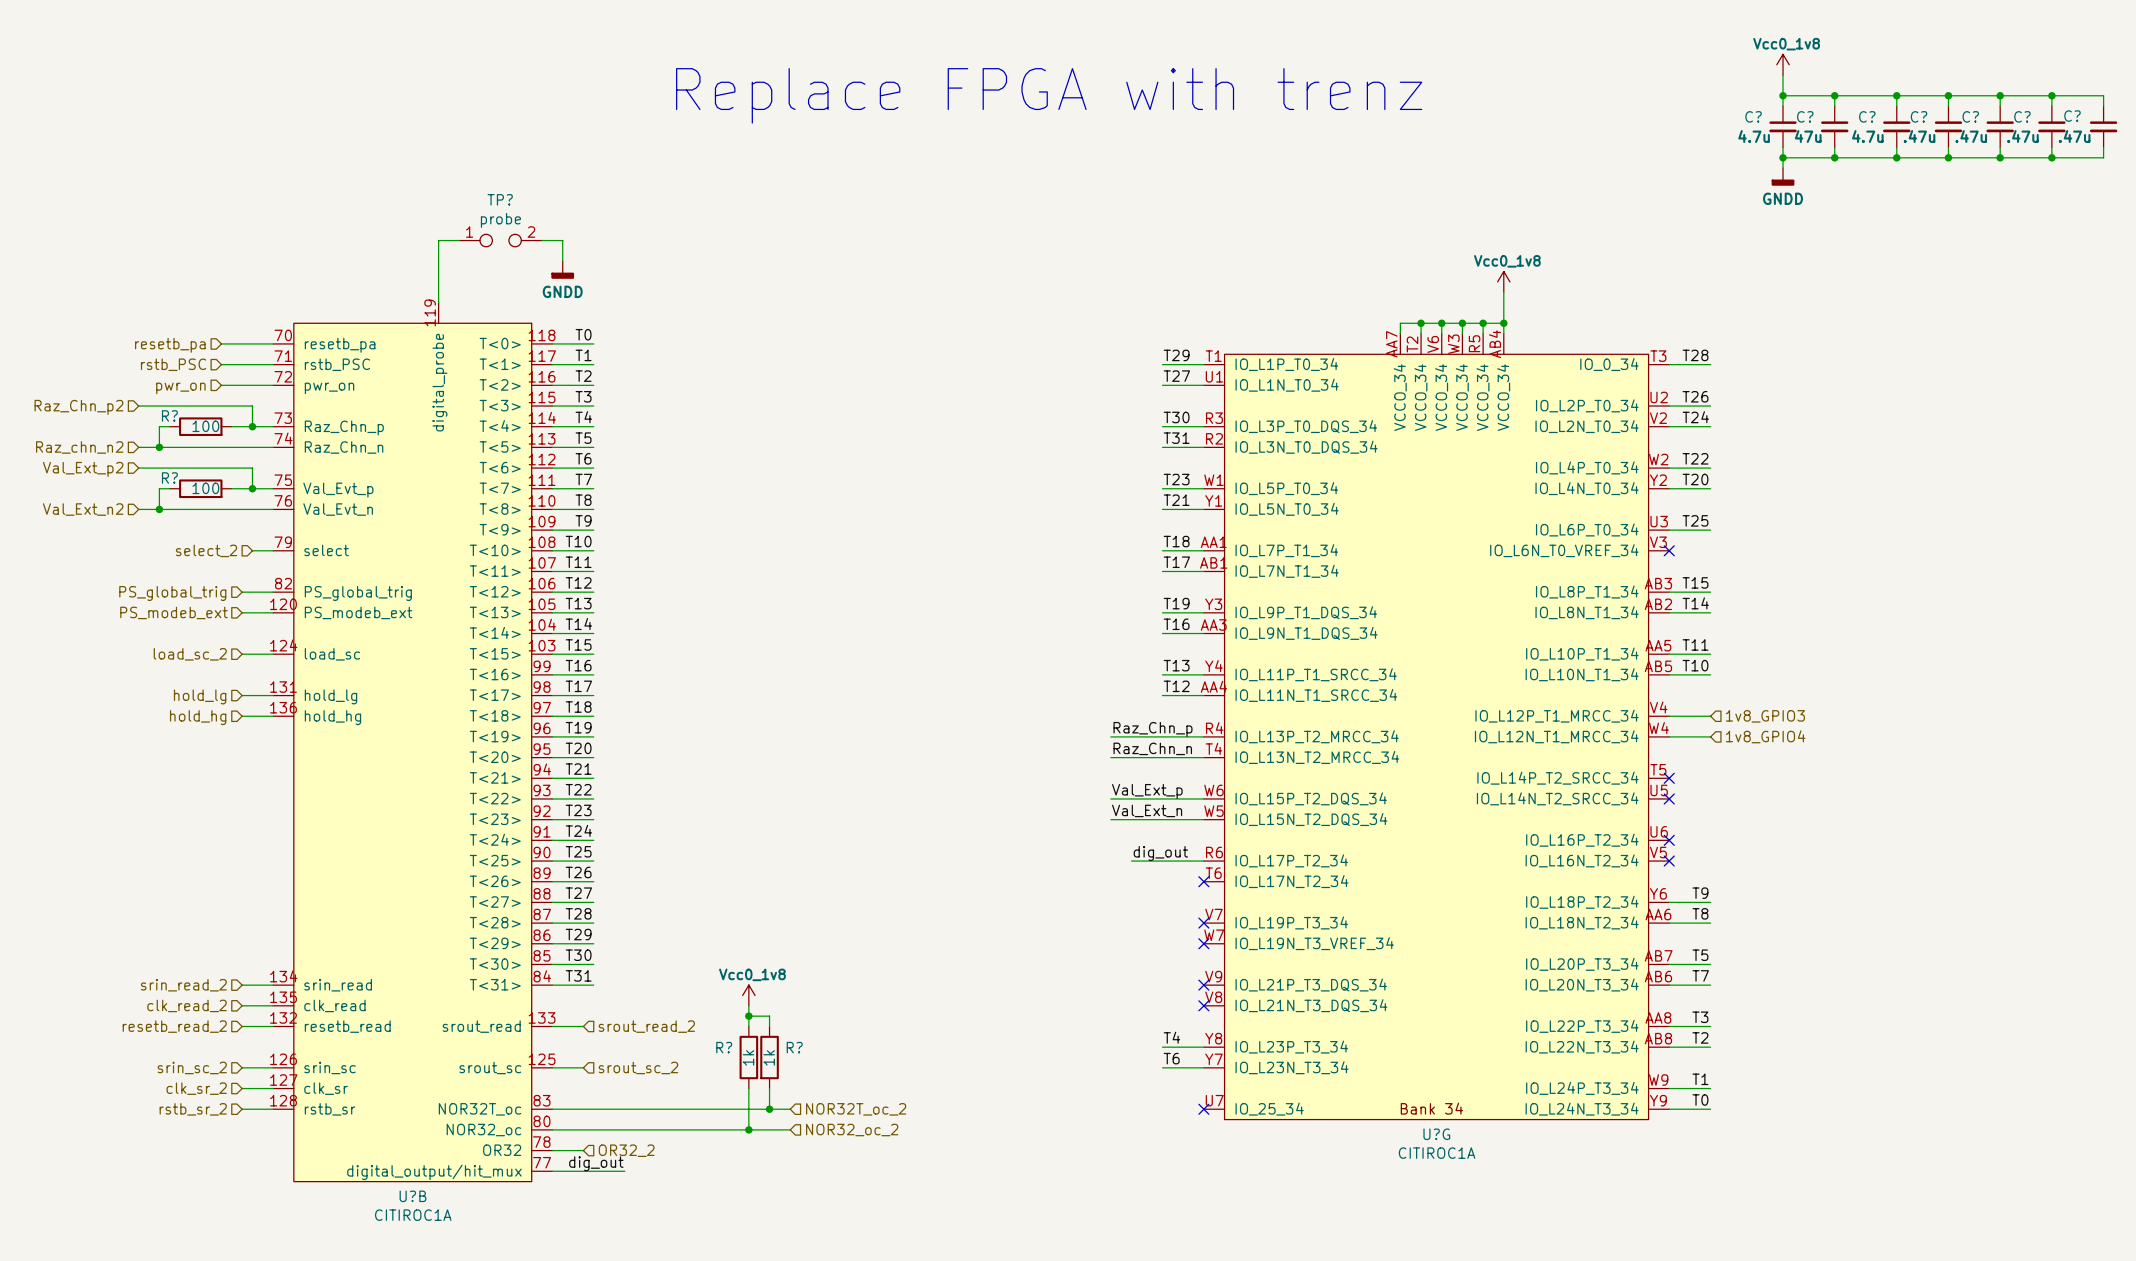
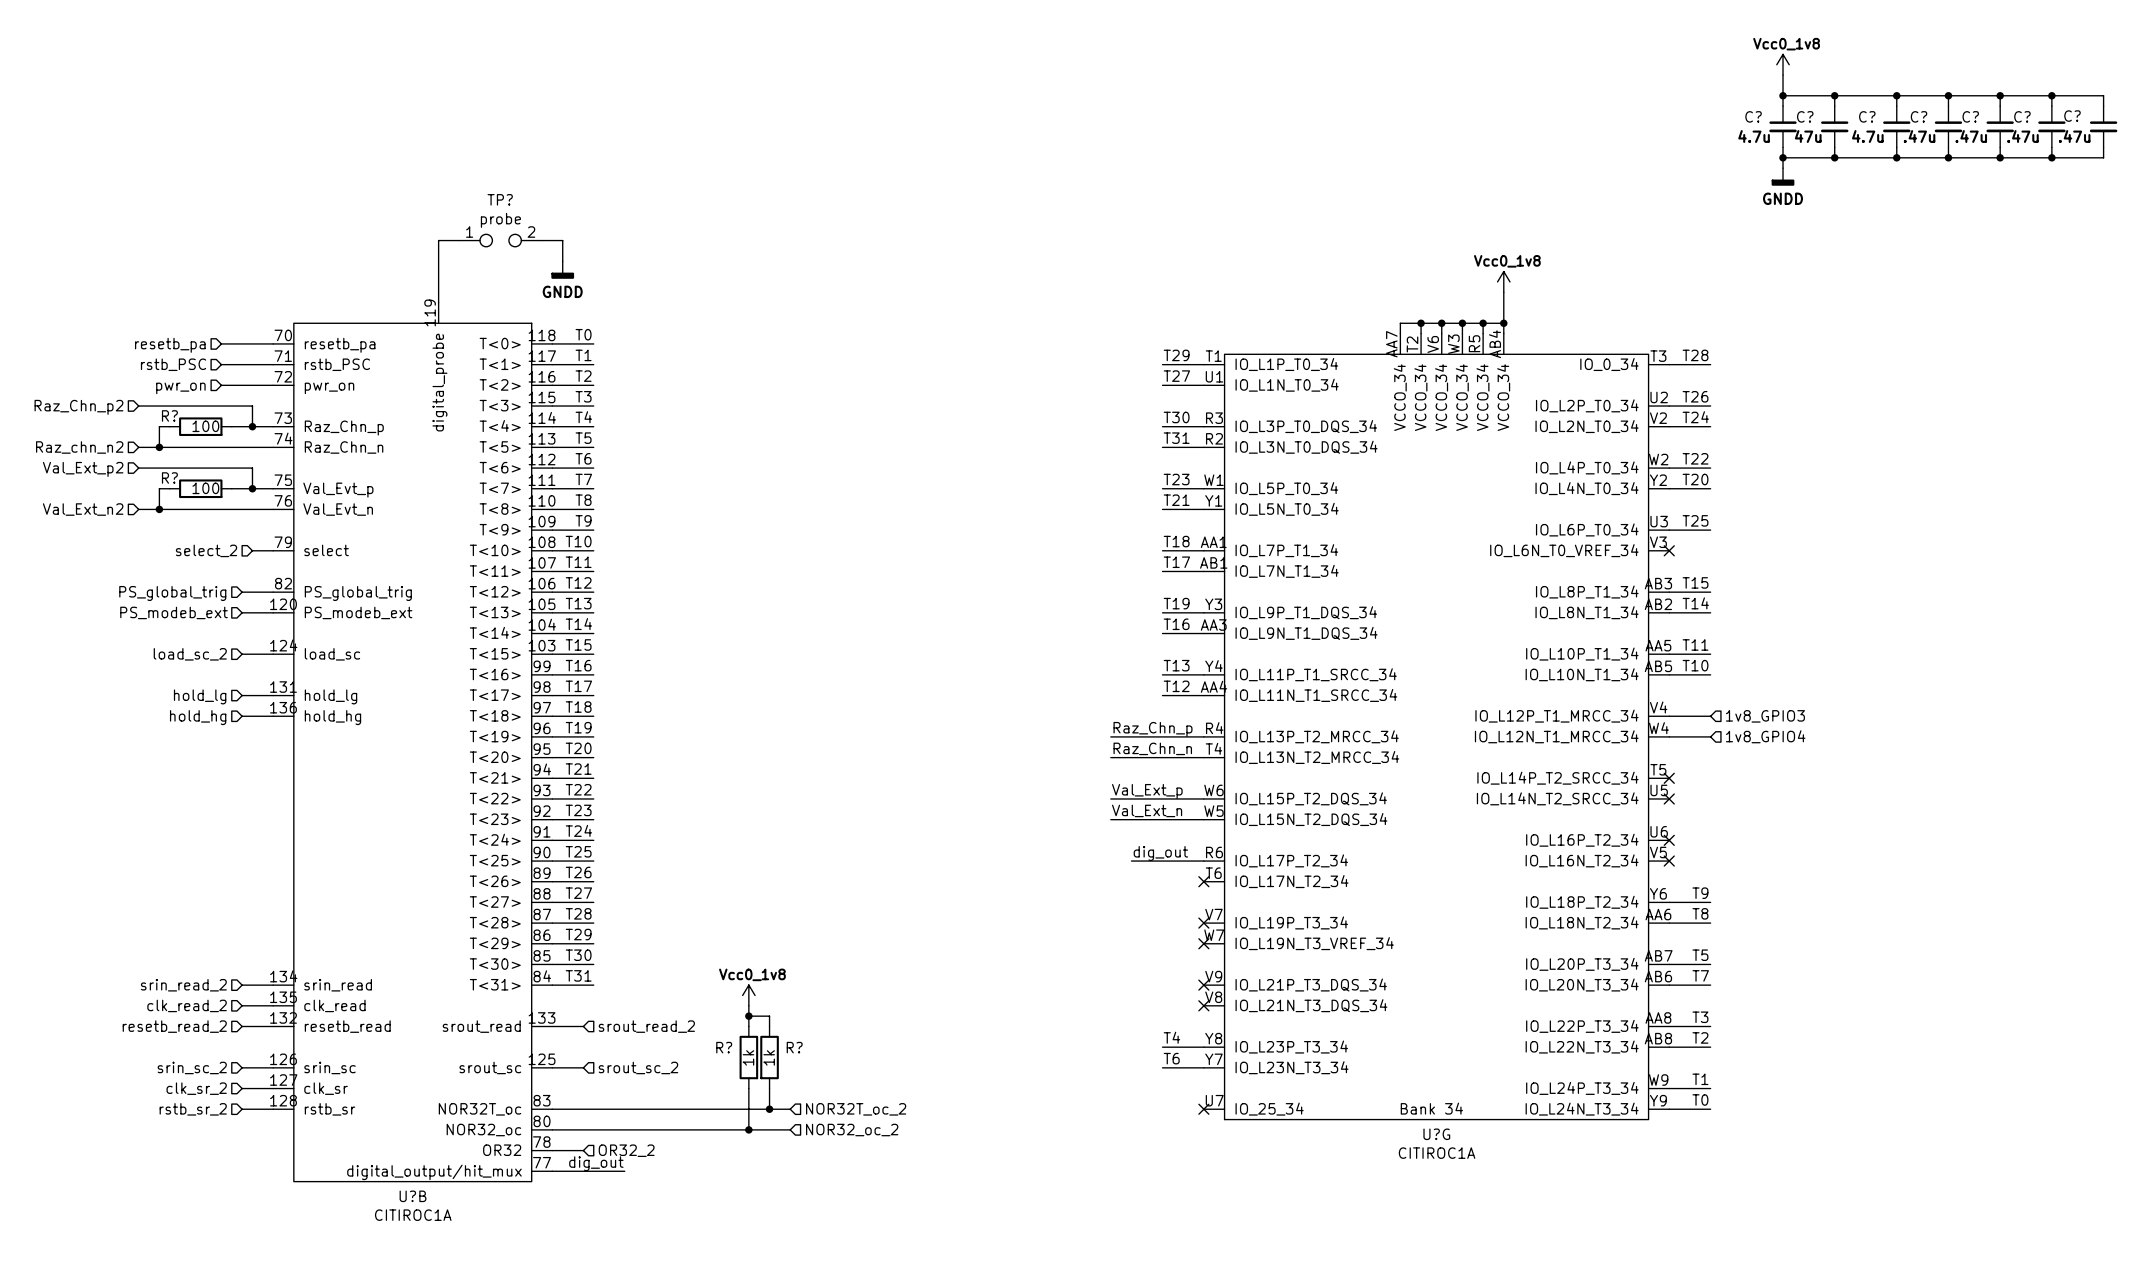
text: Replace FPGA with trenz (1049, 95) -> none

